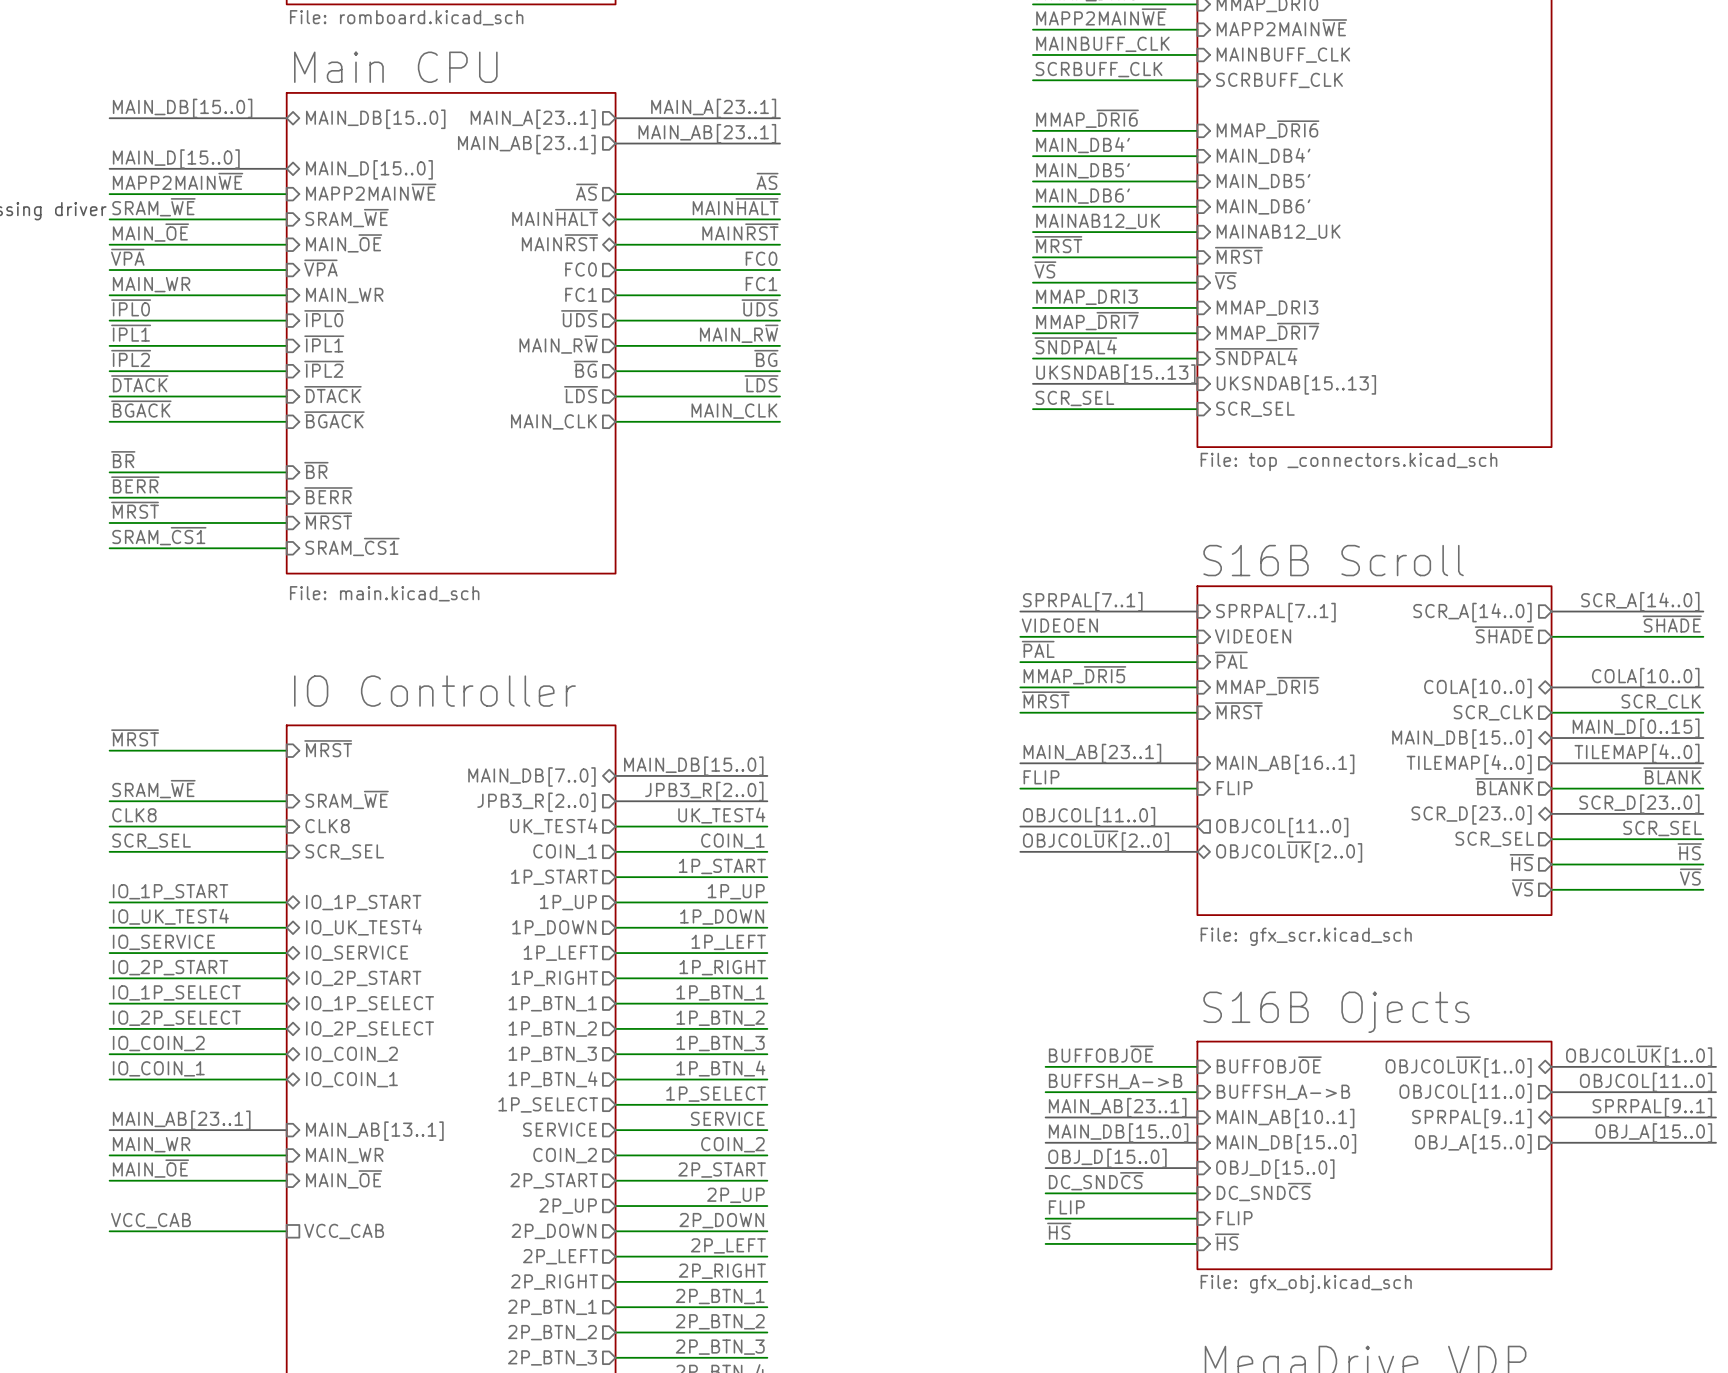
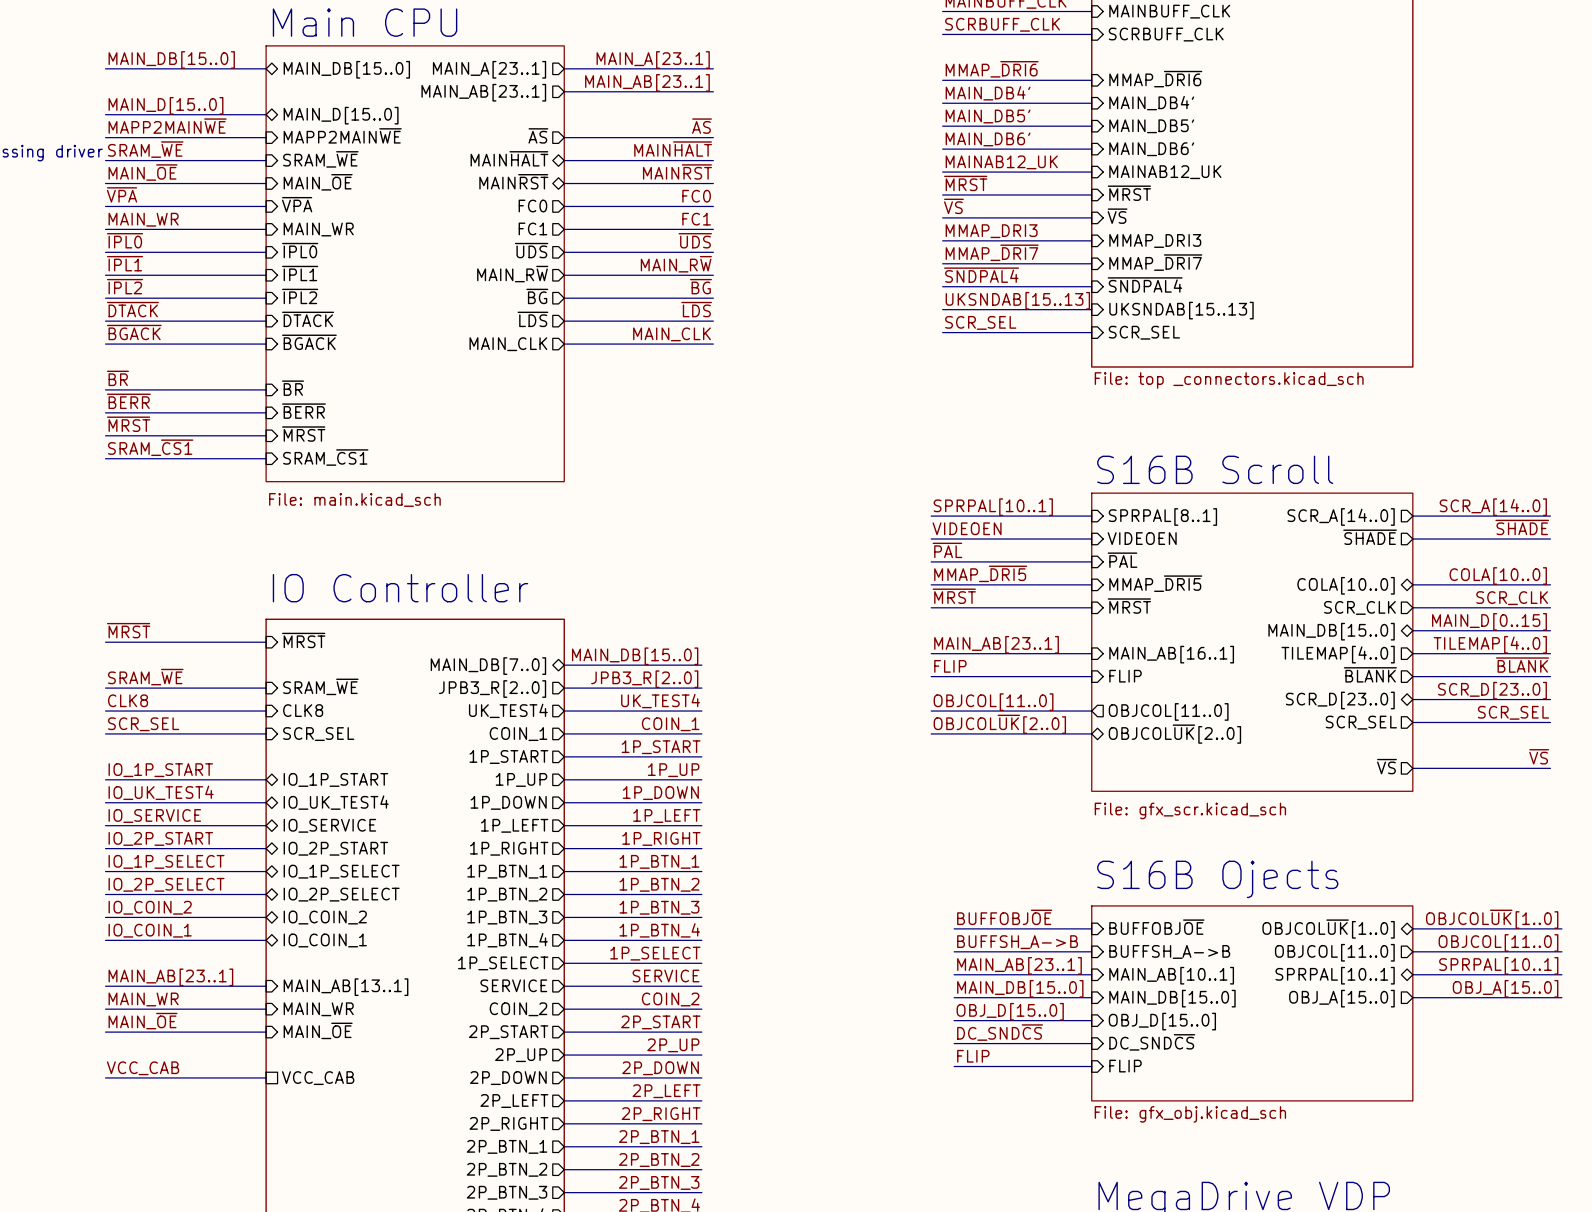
label: SPRPAL[7..1] (1082, 601) -> SPRPAL[10..1] (993, 507)
sheet pin: SPRPAL[7..1] (1275, 612) -> SPRPAL[8..1] (1162, 517)
label: ~{HS} (1689, 851) -> none
sheet pin: ~{HS} (1521, 862) -> none
wire: (1551, 864) (1703, 864) -> none
sheet S16B Ojects shape: [1197, 1041, 1552, 1270] -> [1091, 905, 1413, 1101]
label: SPRPAL[9..1] (1652, 1107) -> SPRPAL[10..1] (1498, 965)
sheet pin: SPRPAL[9..1] (1471, 1118) -> SPRPAL[10..1] (1335, 975)
label: ~{HS} (1059, 1231) -> none
sheet pin: ~{HS} (1227, 1242) -> none
wire: (1045, 1243) (1197, 1243) -> none

